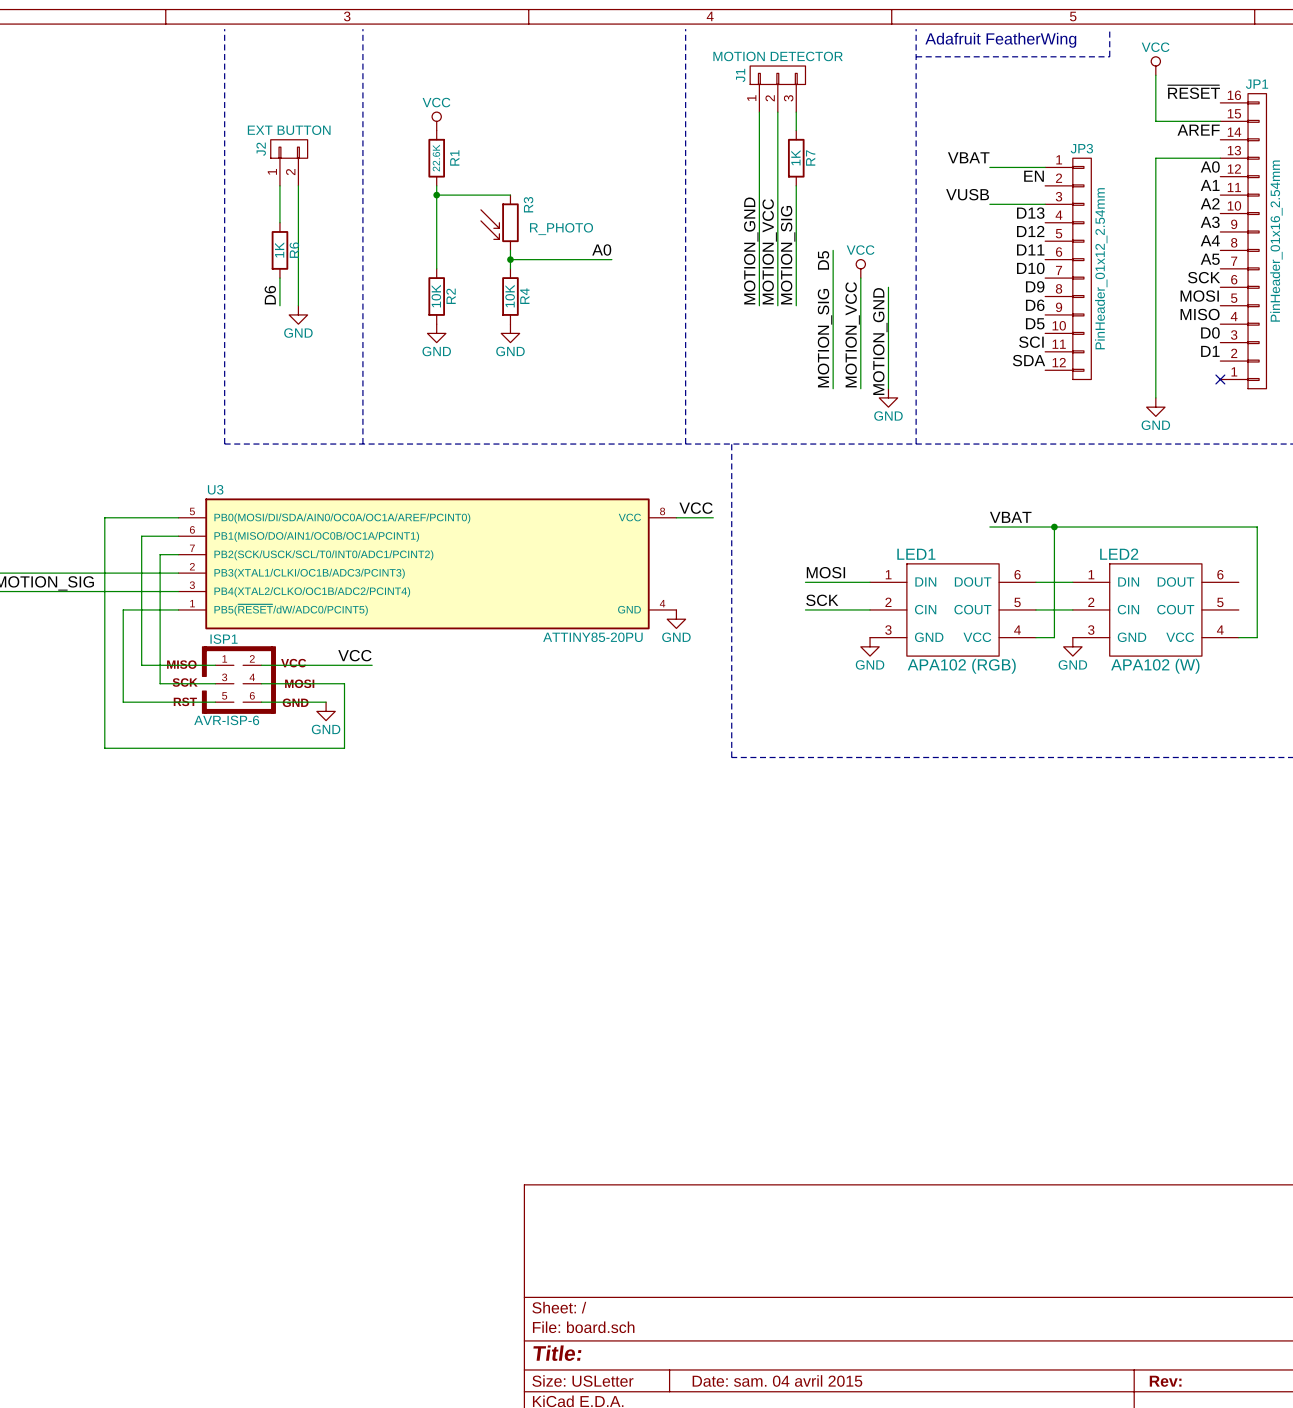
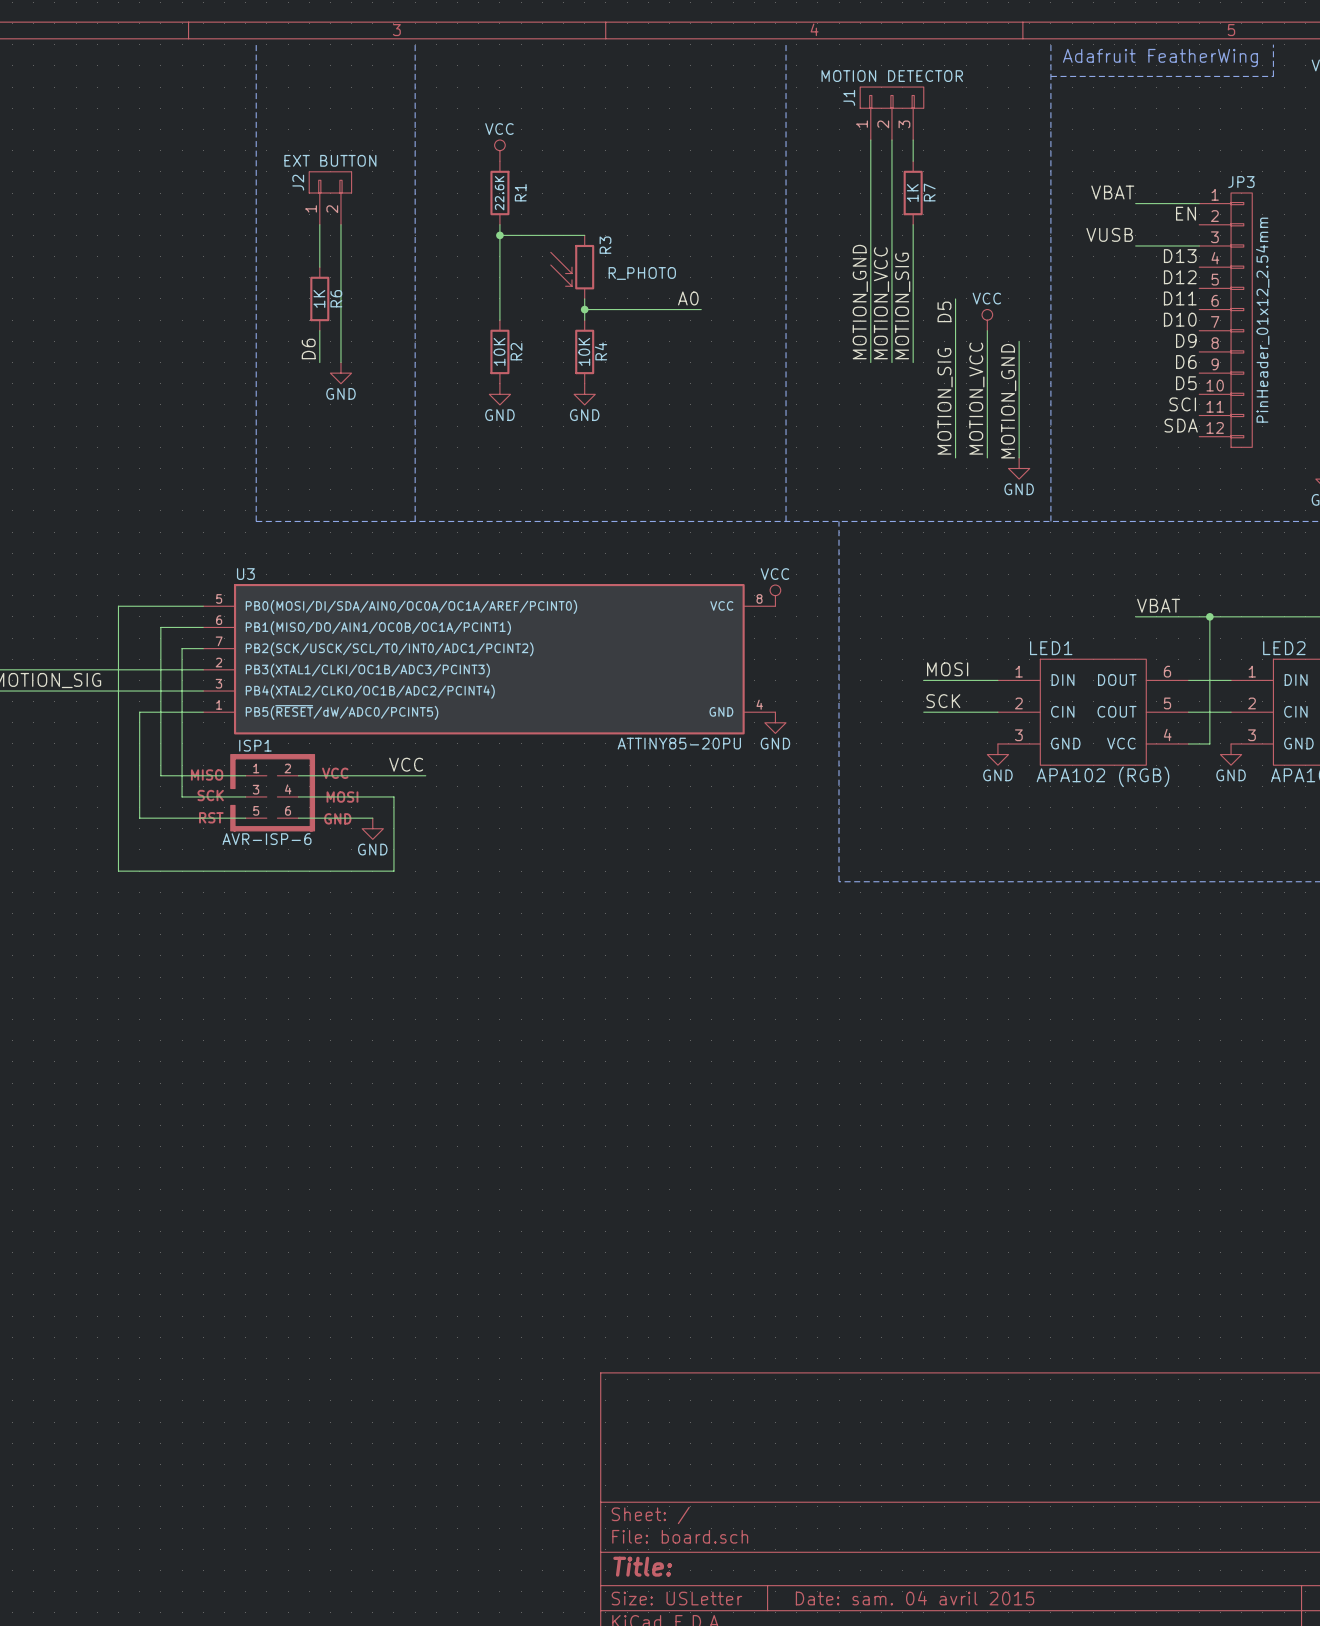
power symbol: none -> VCC (775, 595)
label: VCC (696, 508) -> none
wire: (676, 517) (713, 517) -> none

